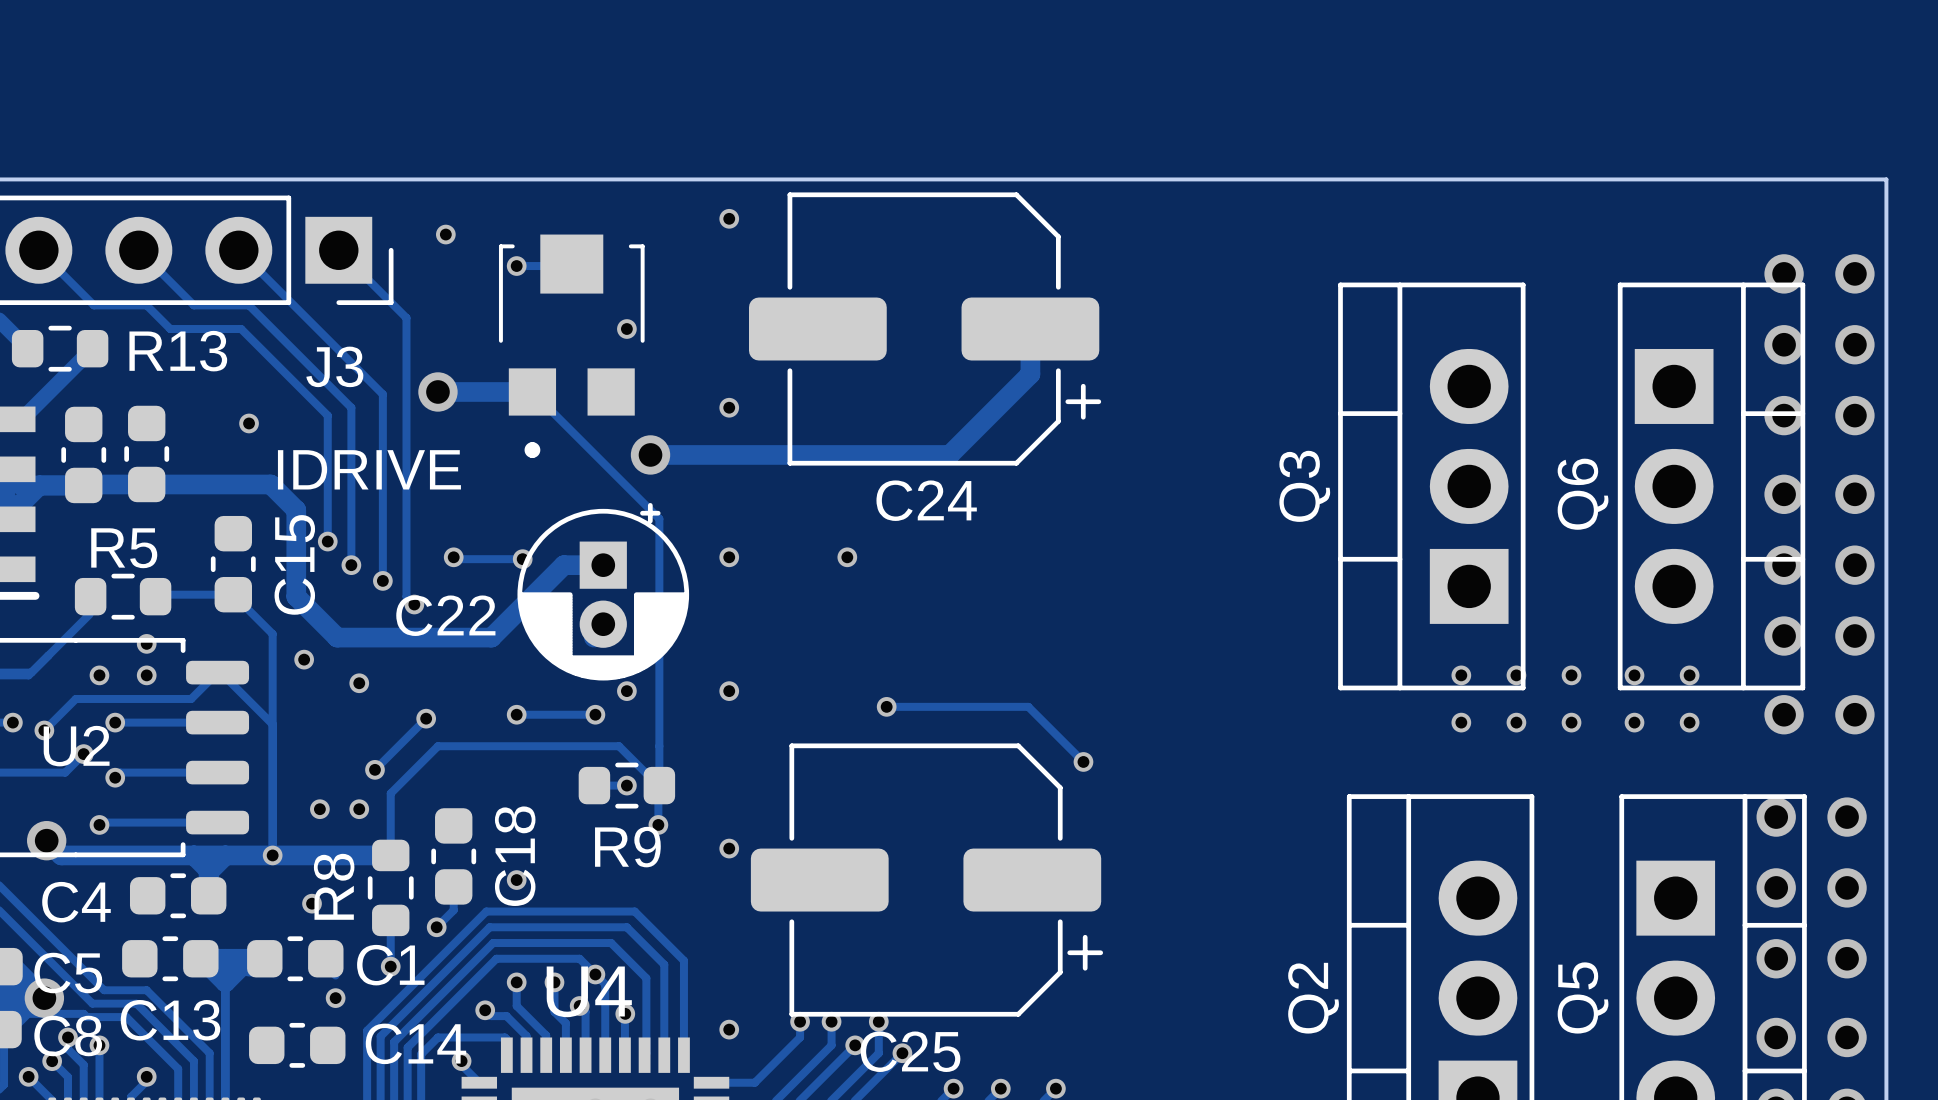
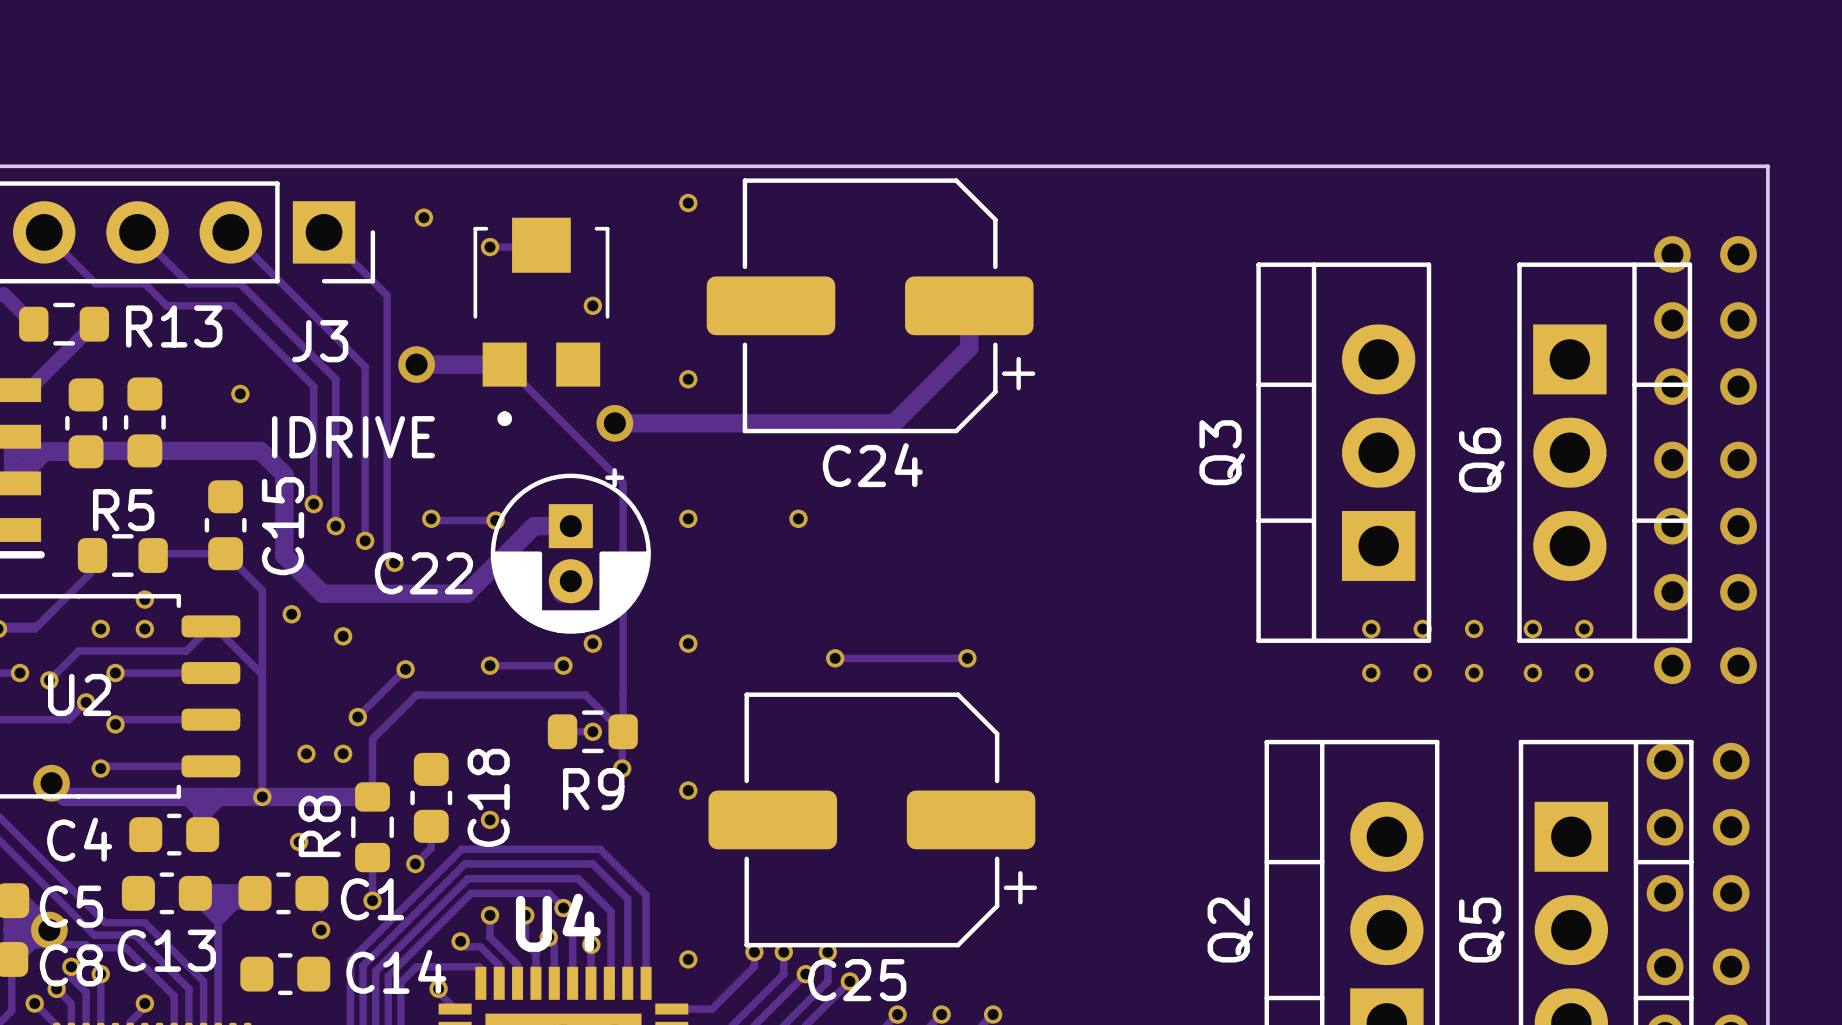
track: (1028, 706) (1083, 761) -> none
via position: (1083, 761) -> (967, 658)

